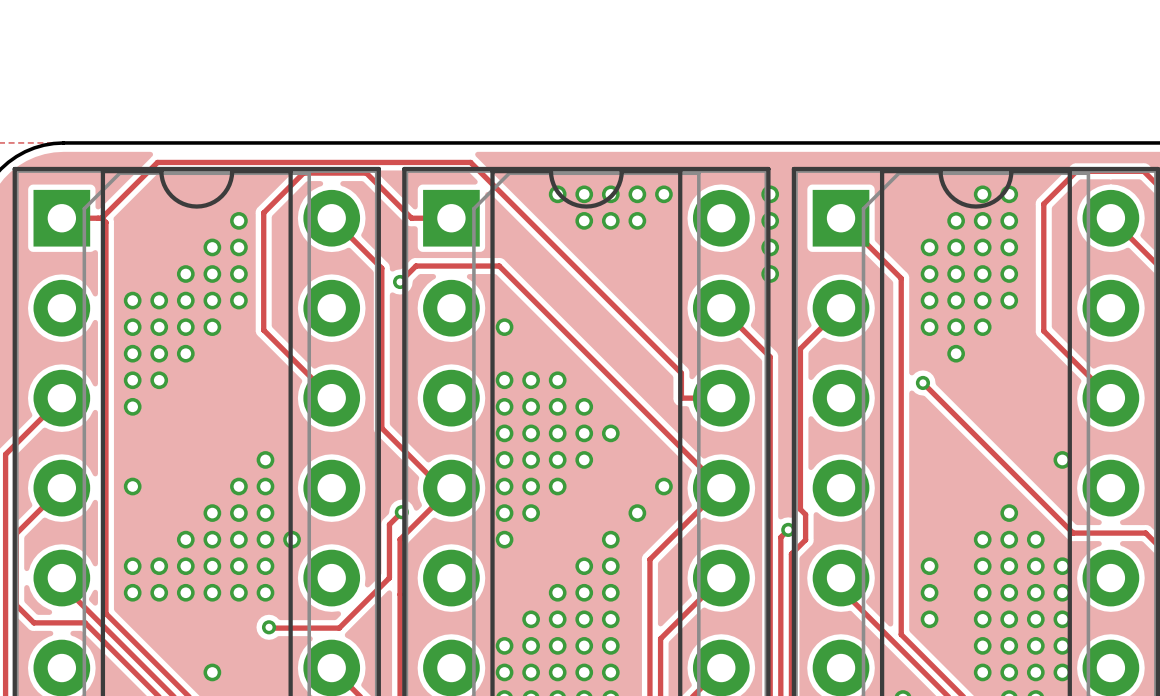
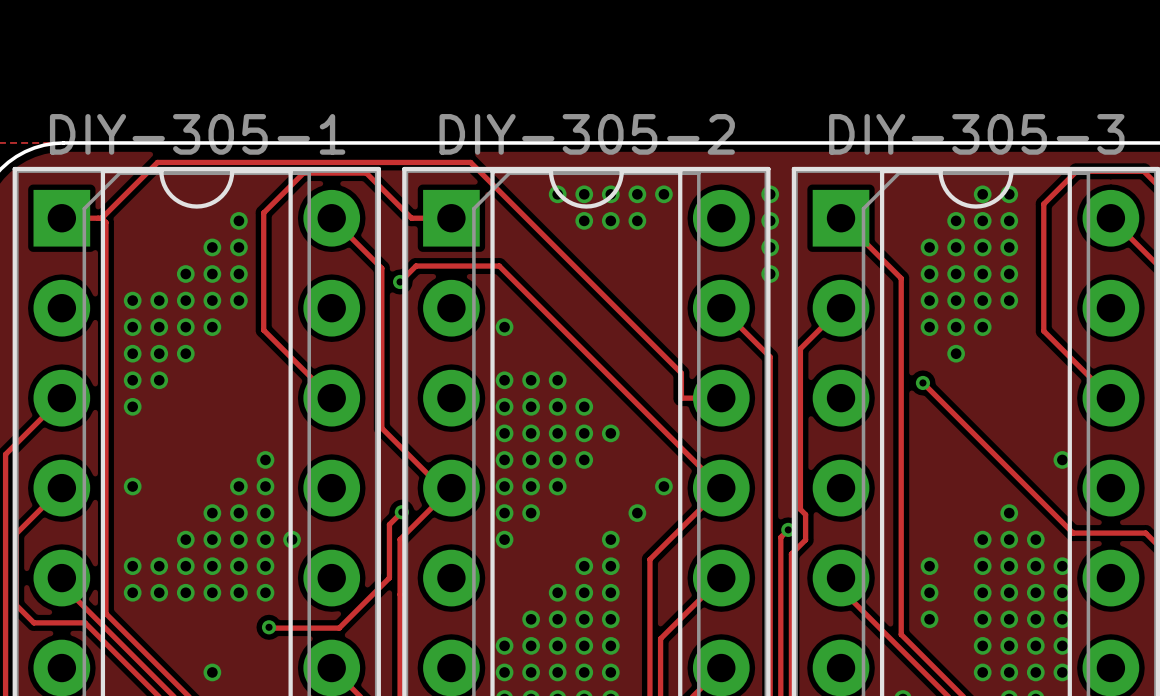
DIY-305-1 name: none -> DIY-305-1 (197, 134)
DIY-305-2 name: none -> DIY-305-2 (587, 134)
DIY-305-3 name: none -> DIY-305-3 (976, 134)

